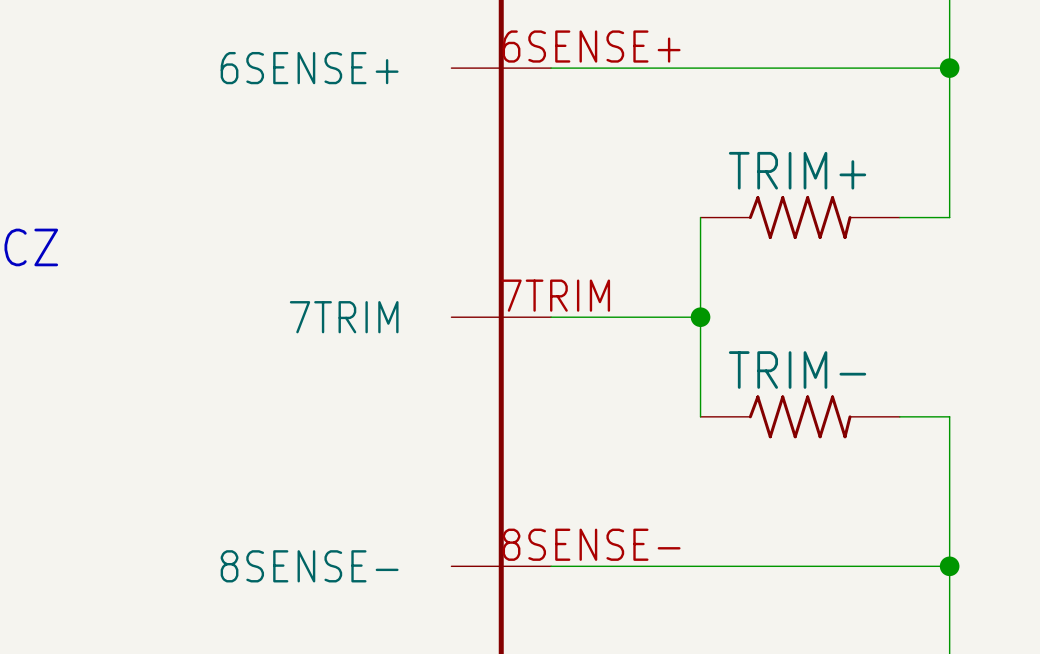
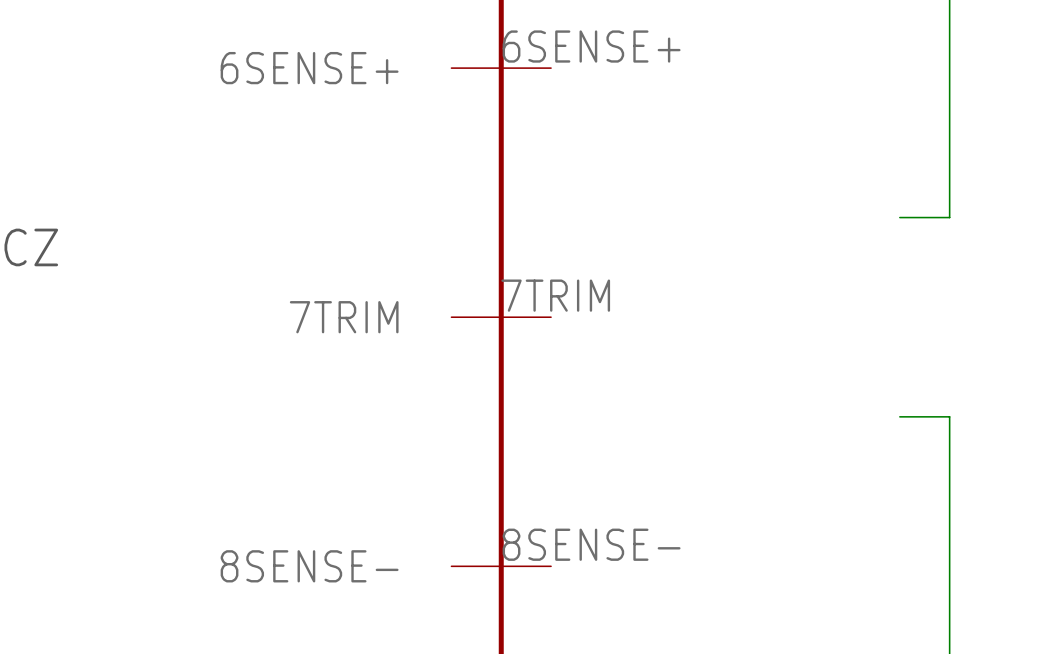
wire: (551, 68) (949, 68) -> none
junction: (949, 68) -> none
wire: (700, 217) (700, 416) -> none
TRIM+: (800, 217) -> none
wire: (551, 317) (700, 317) -> none
junction: (700, 317) -> none
TRIM-: (800, 416) -> none
wire: (551, 566) (949, 566) -> none
junction: (949, 566) -> none

